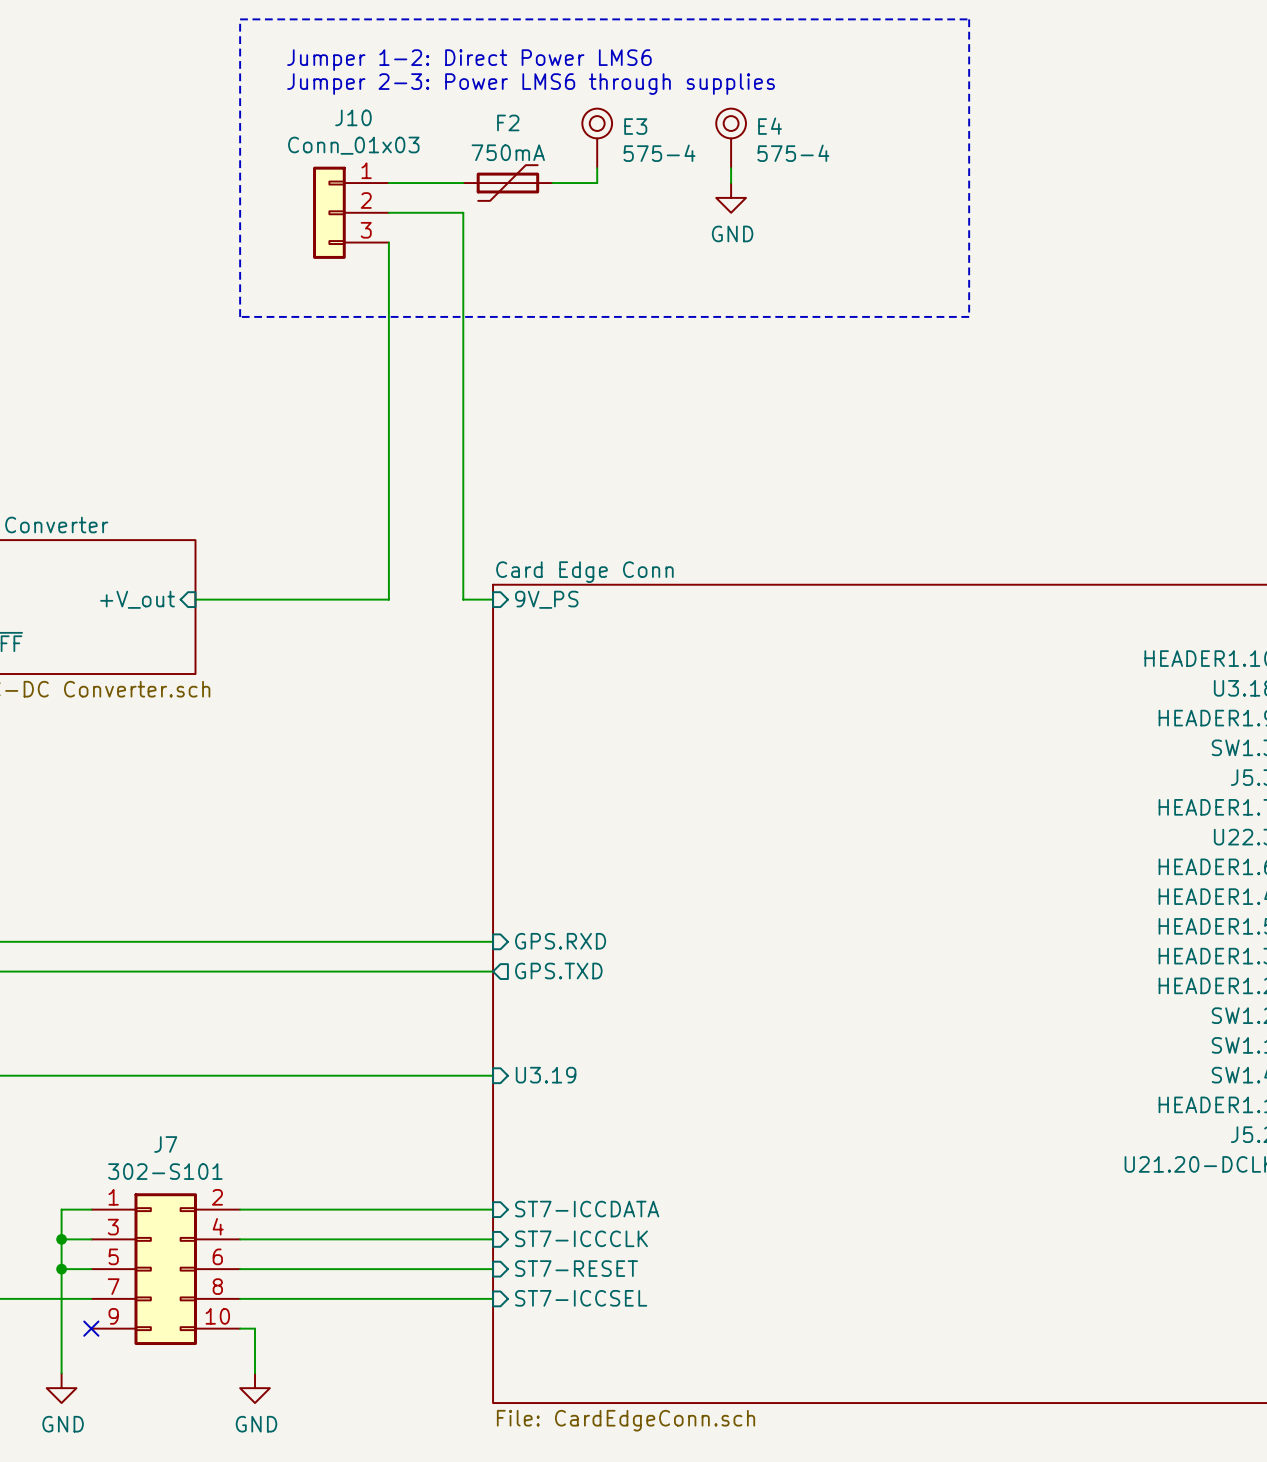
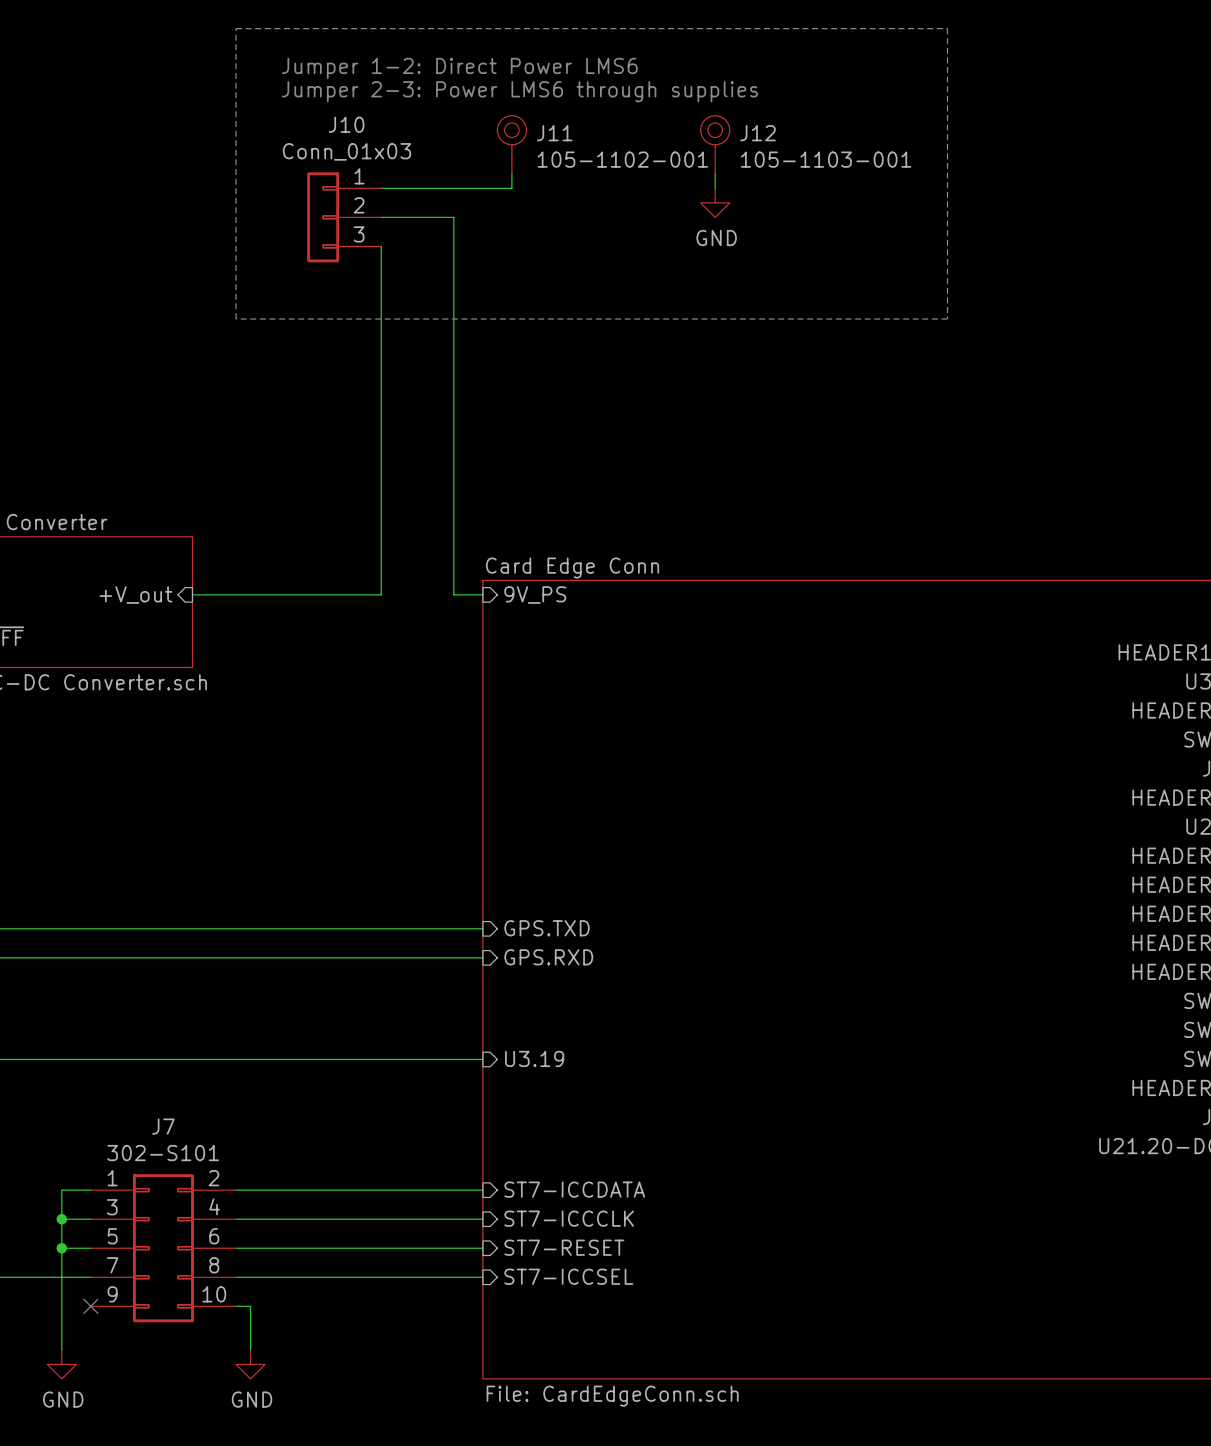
E4 name: E4 (770, 126) -> J12 (757, 133)
J11: none -> 105-1102-001 (511, 144)
E3: 575-4 (597, 138) -> none
E4 value: 575-4 (793, 153) -> 105-1103-001 (826, 159)
wire: (597, 168) (597, 183) (552, 183) -> none
F2: 750mA (507, 183) -> none
sheet pin: GPS.RXD (560, 941) -> GPS.TXD (547, 928)
sheet pin shape: output (558, 971) -> input (548, 957)
sheet pin: GPS.TXD (558, 971) -> GPS.RXD (548, 957)

